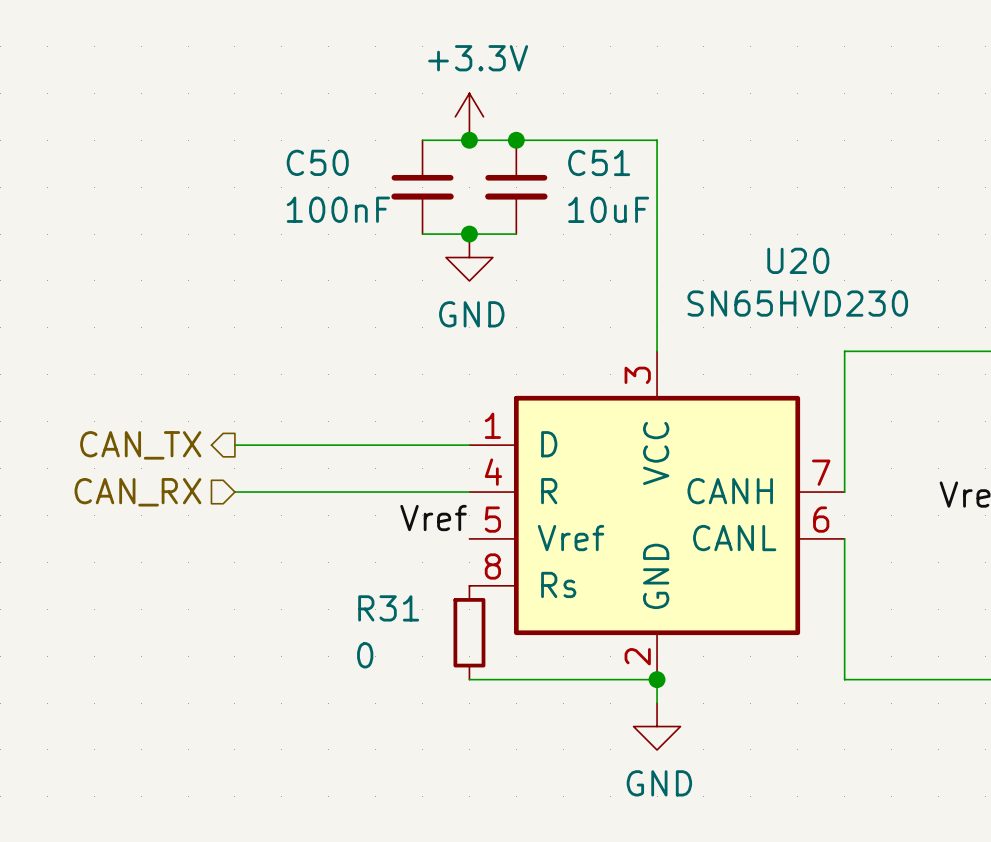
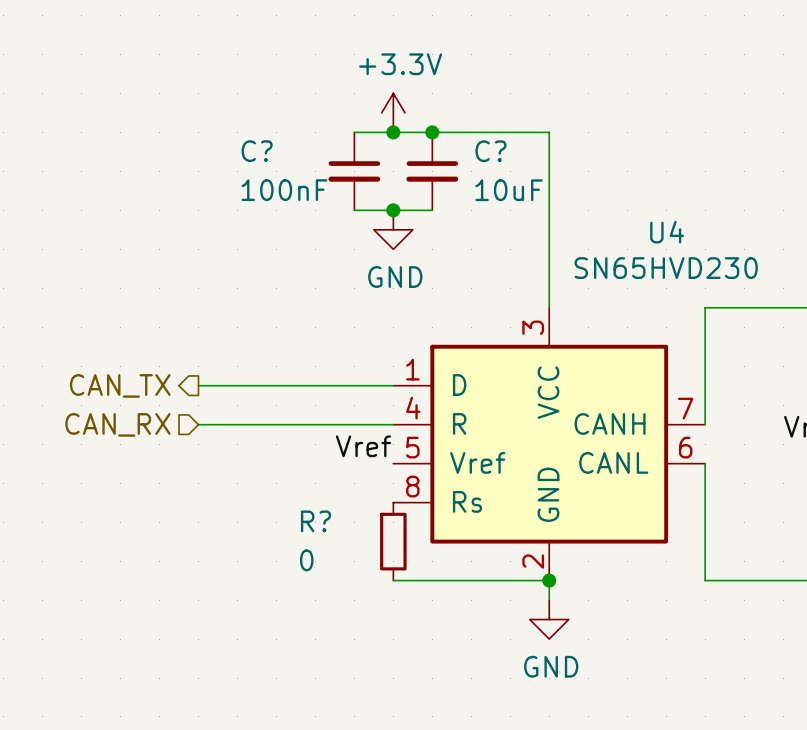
C50 name: C50 (317, 162) -> C? (257, 151)
C51 name: C51 (599, 162) -> C? (490, 151)
U20 name: U20 (798, 260) -> U4 (667, 232)
R31 name: R31 (388, 608) -> R? (316, 521)

